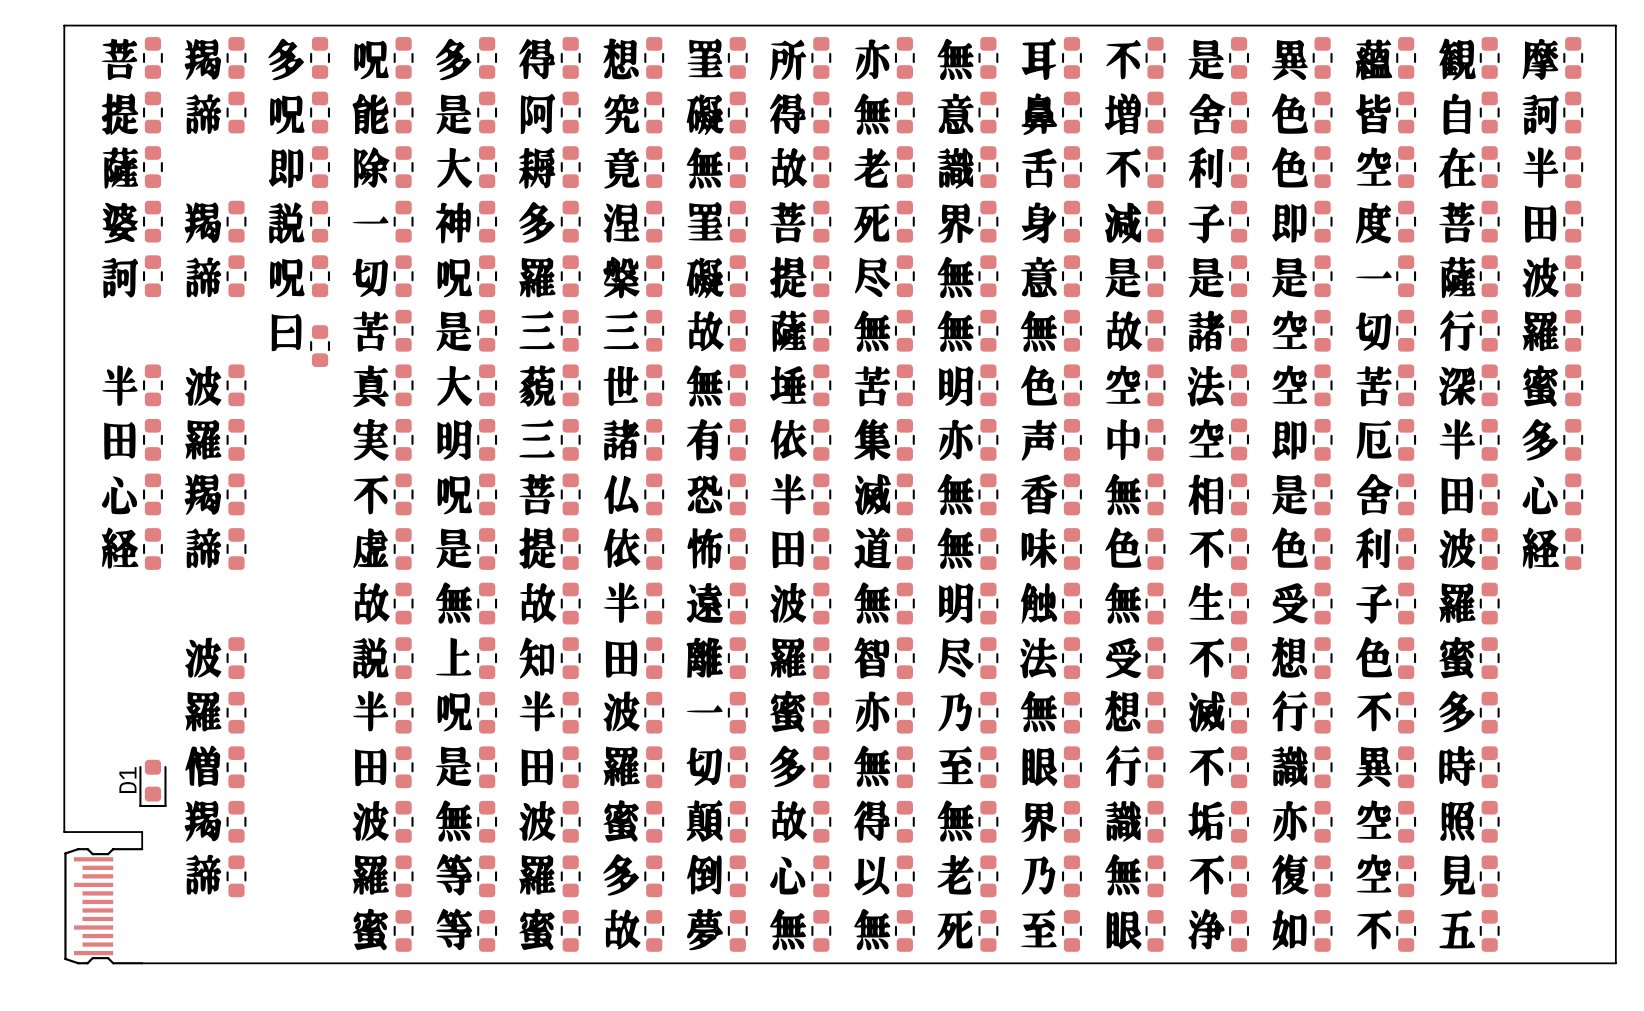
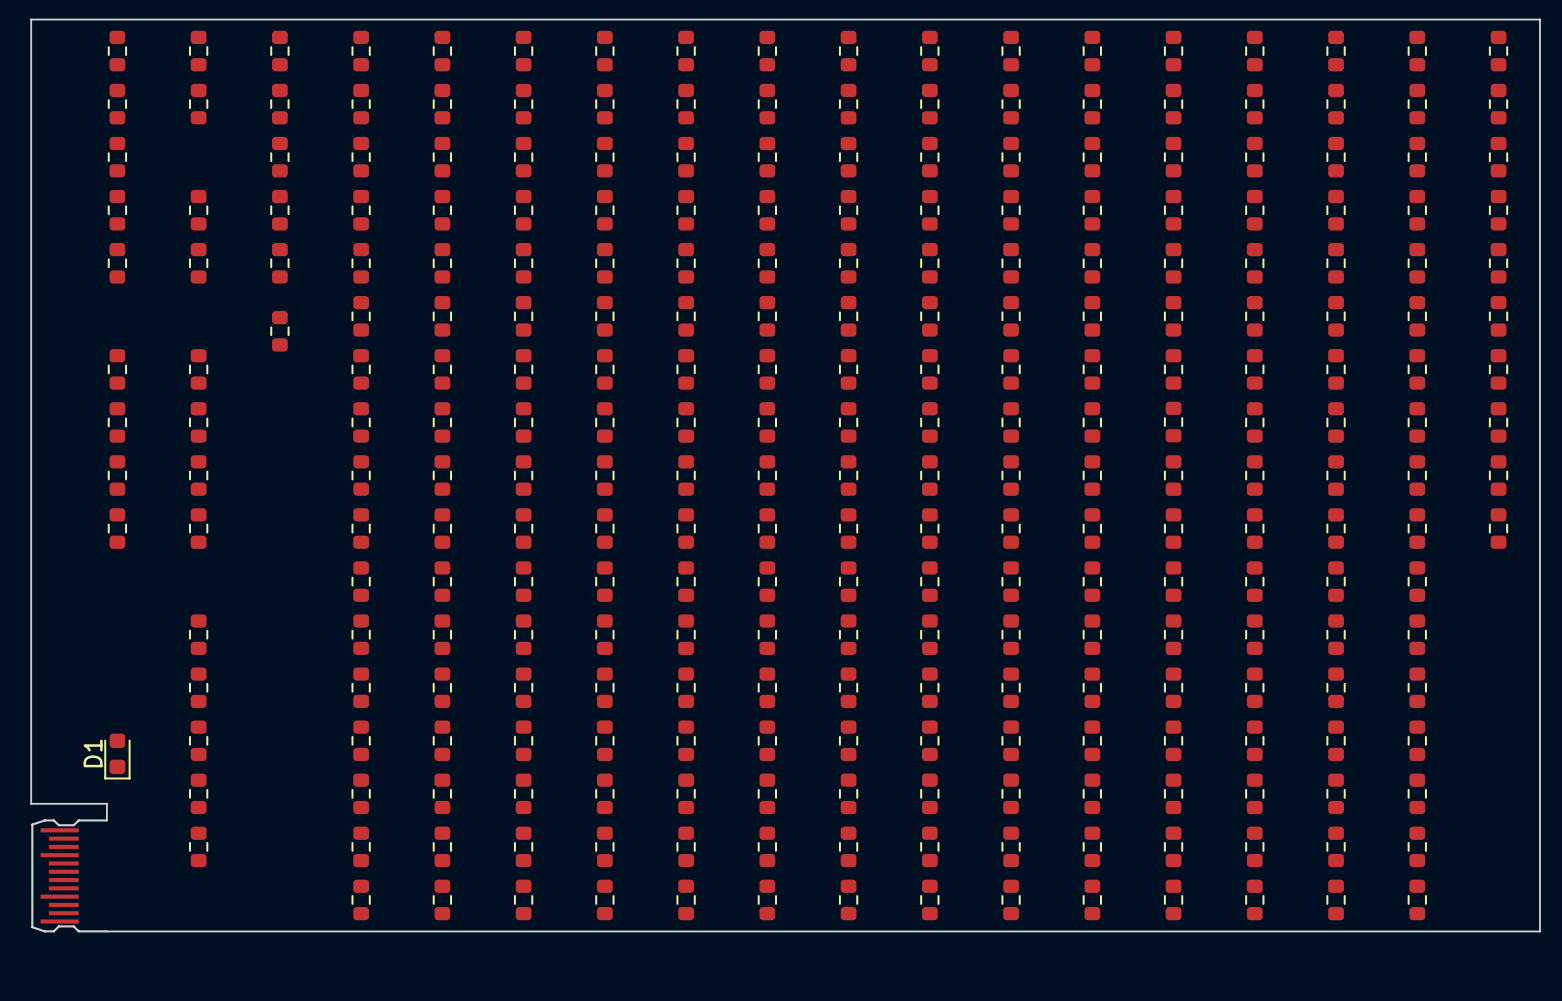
drawing: [101, 37, 1560, 951] -> none

